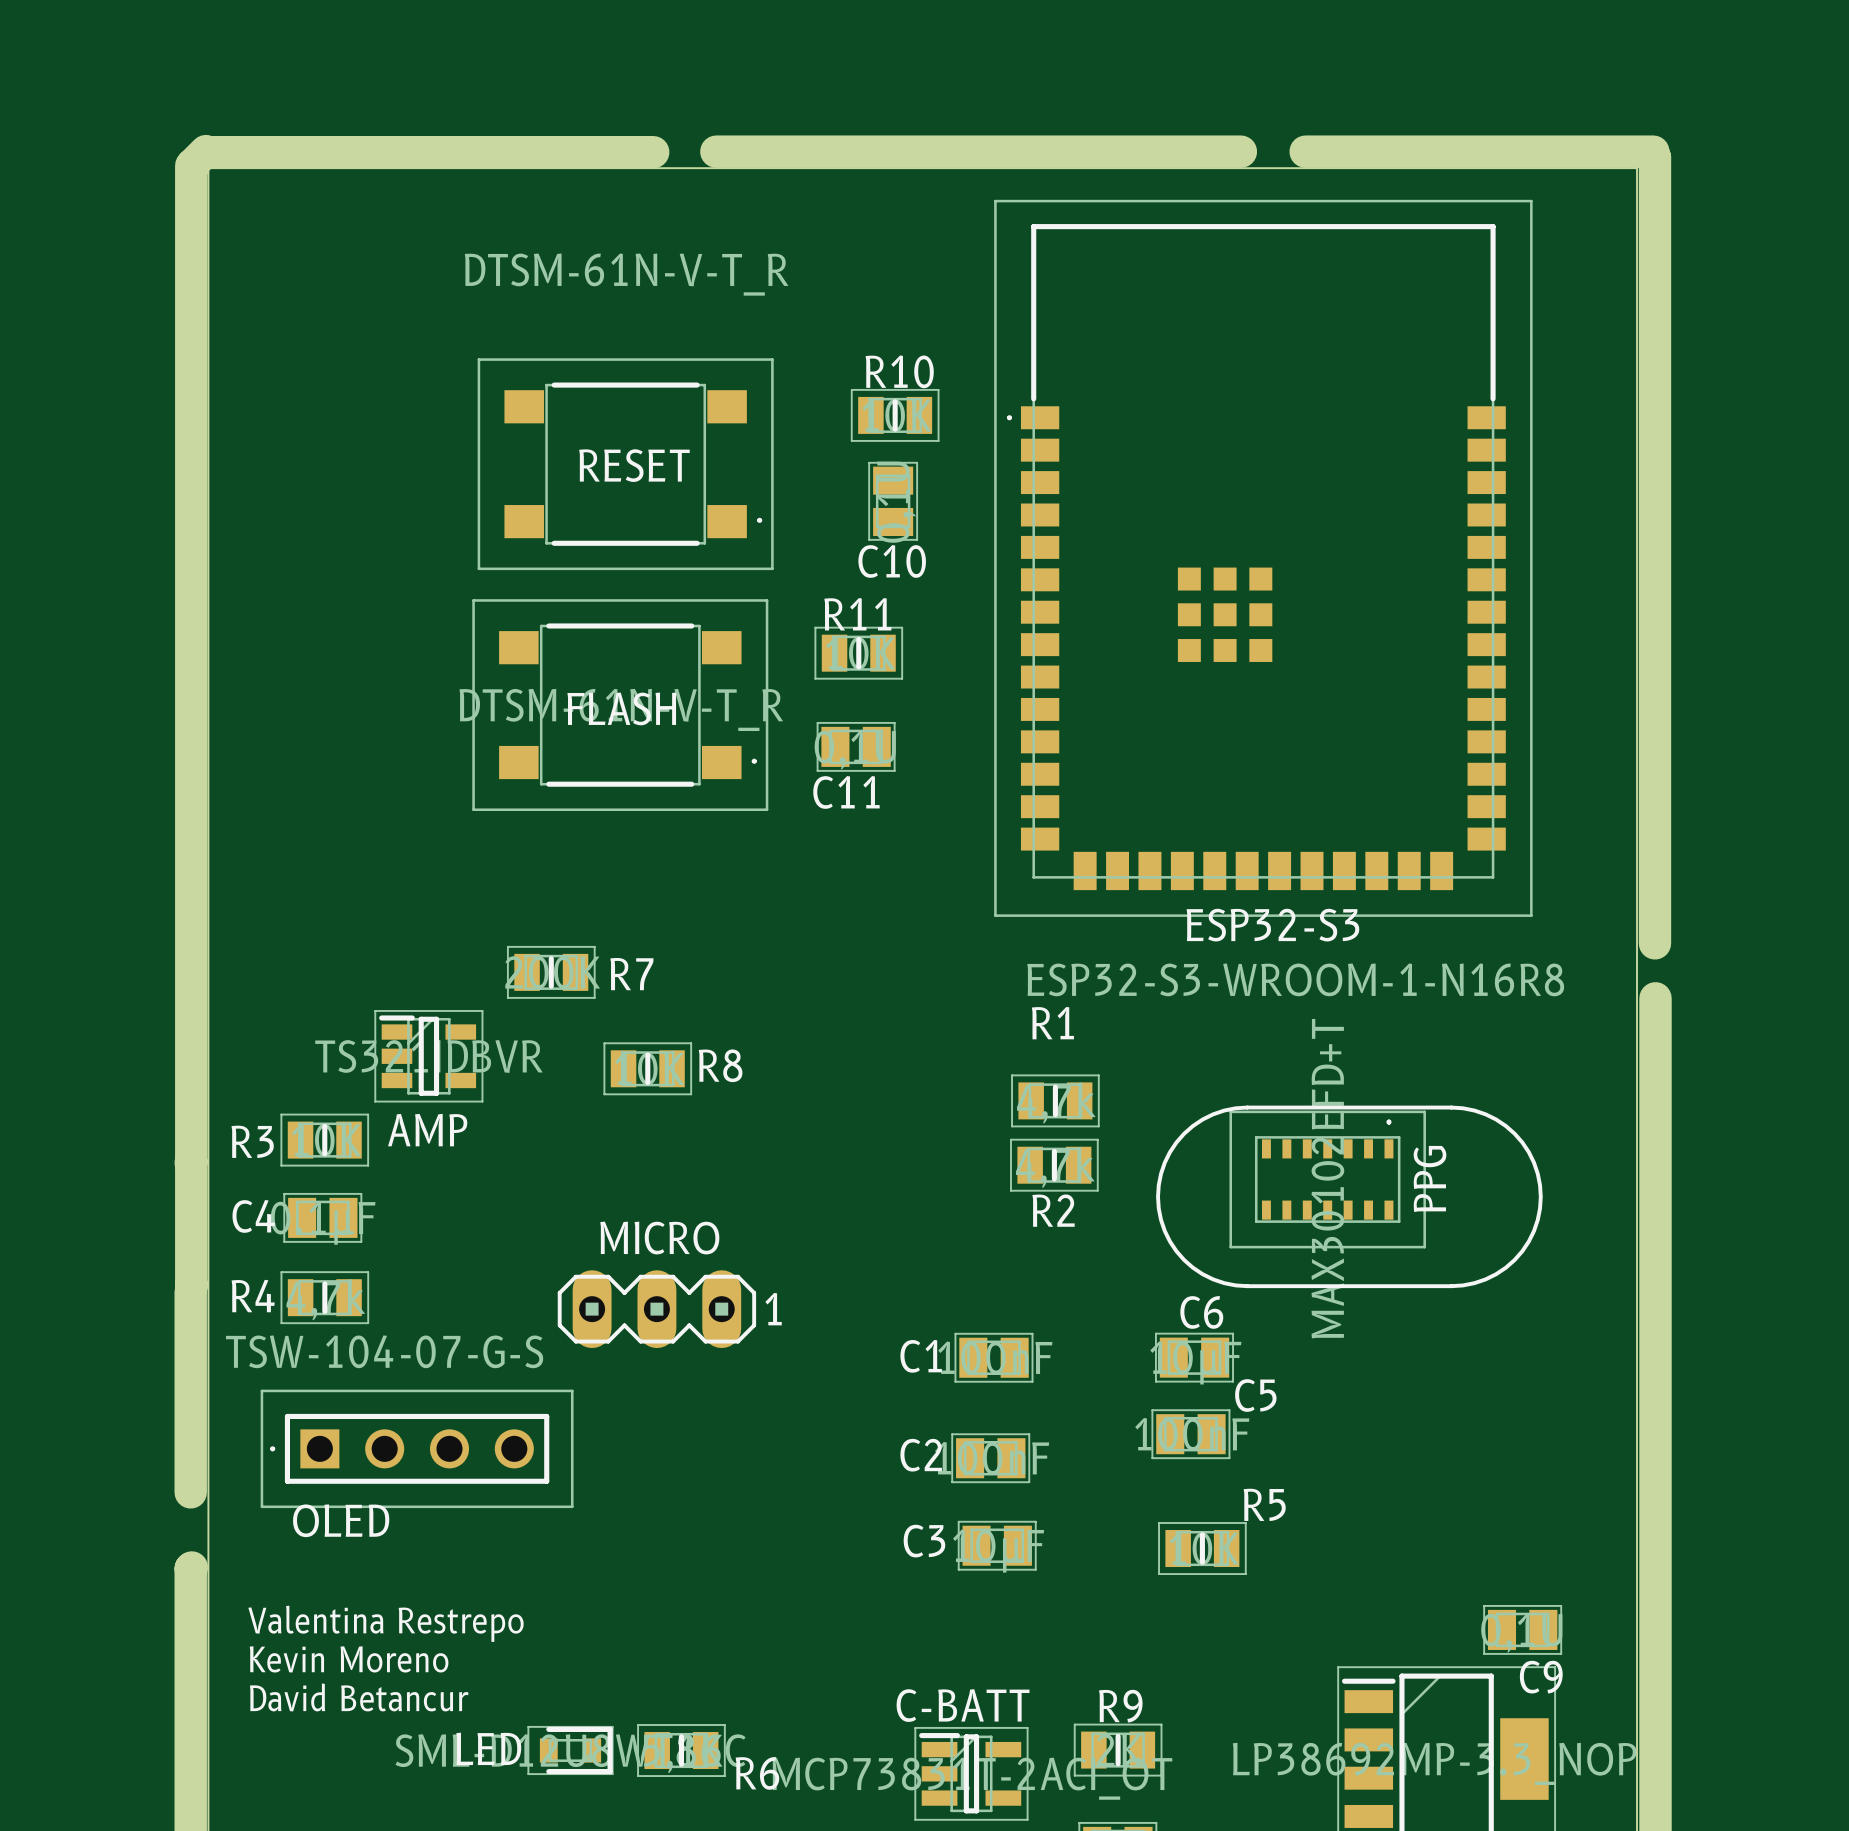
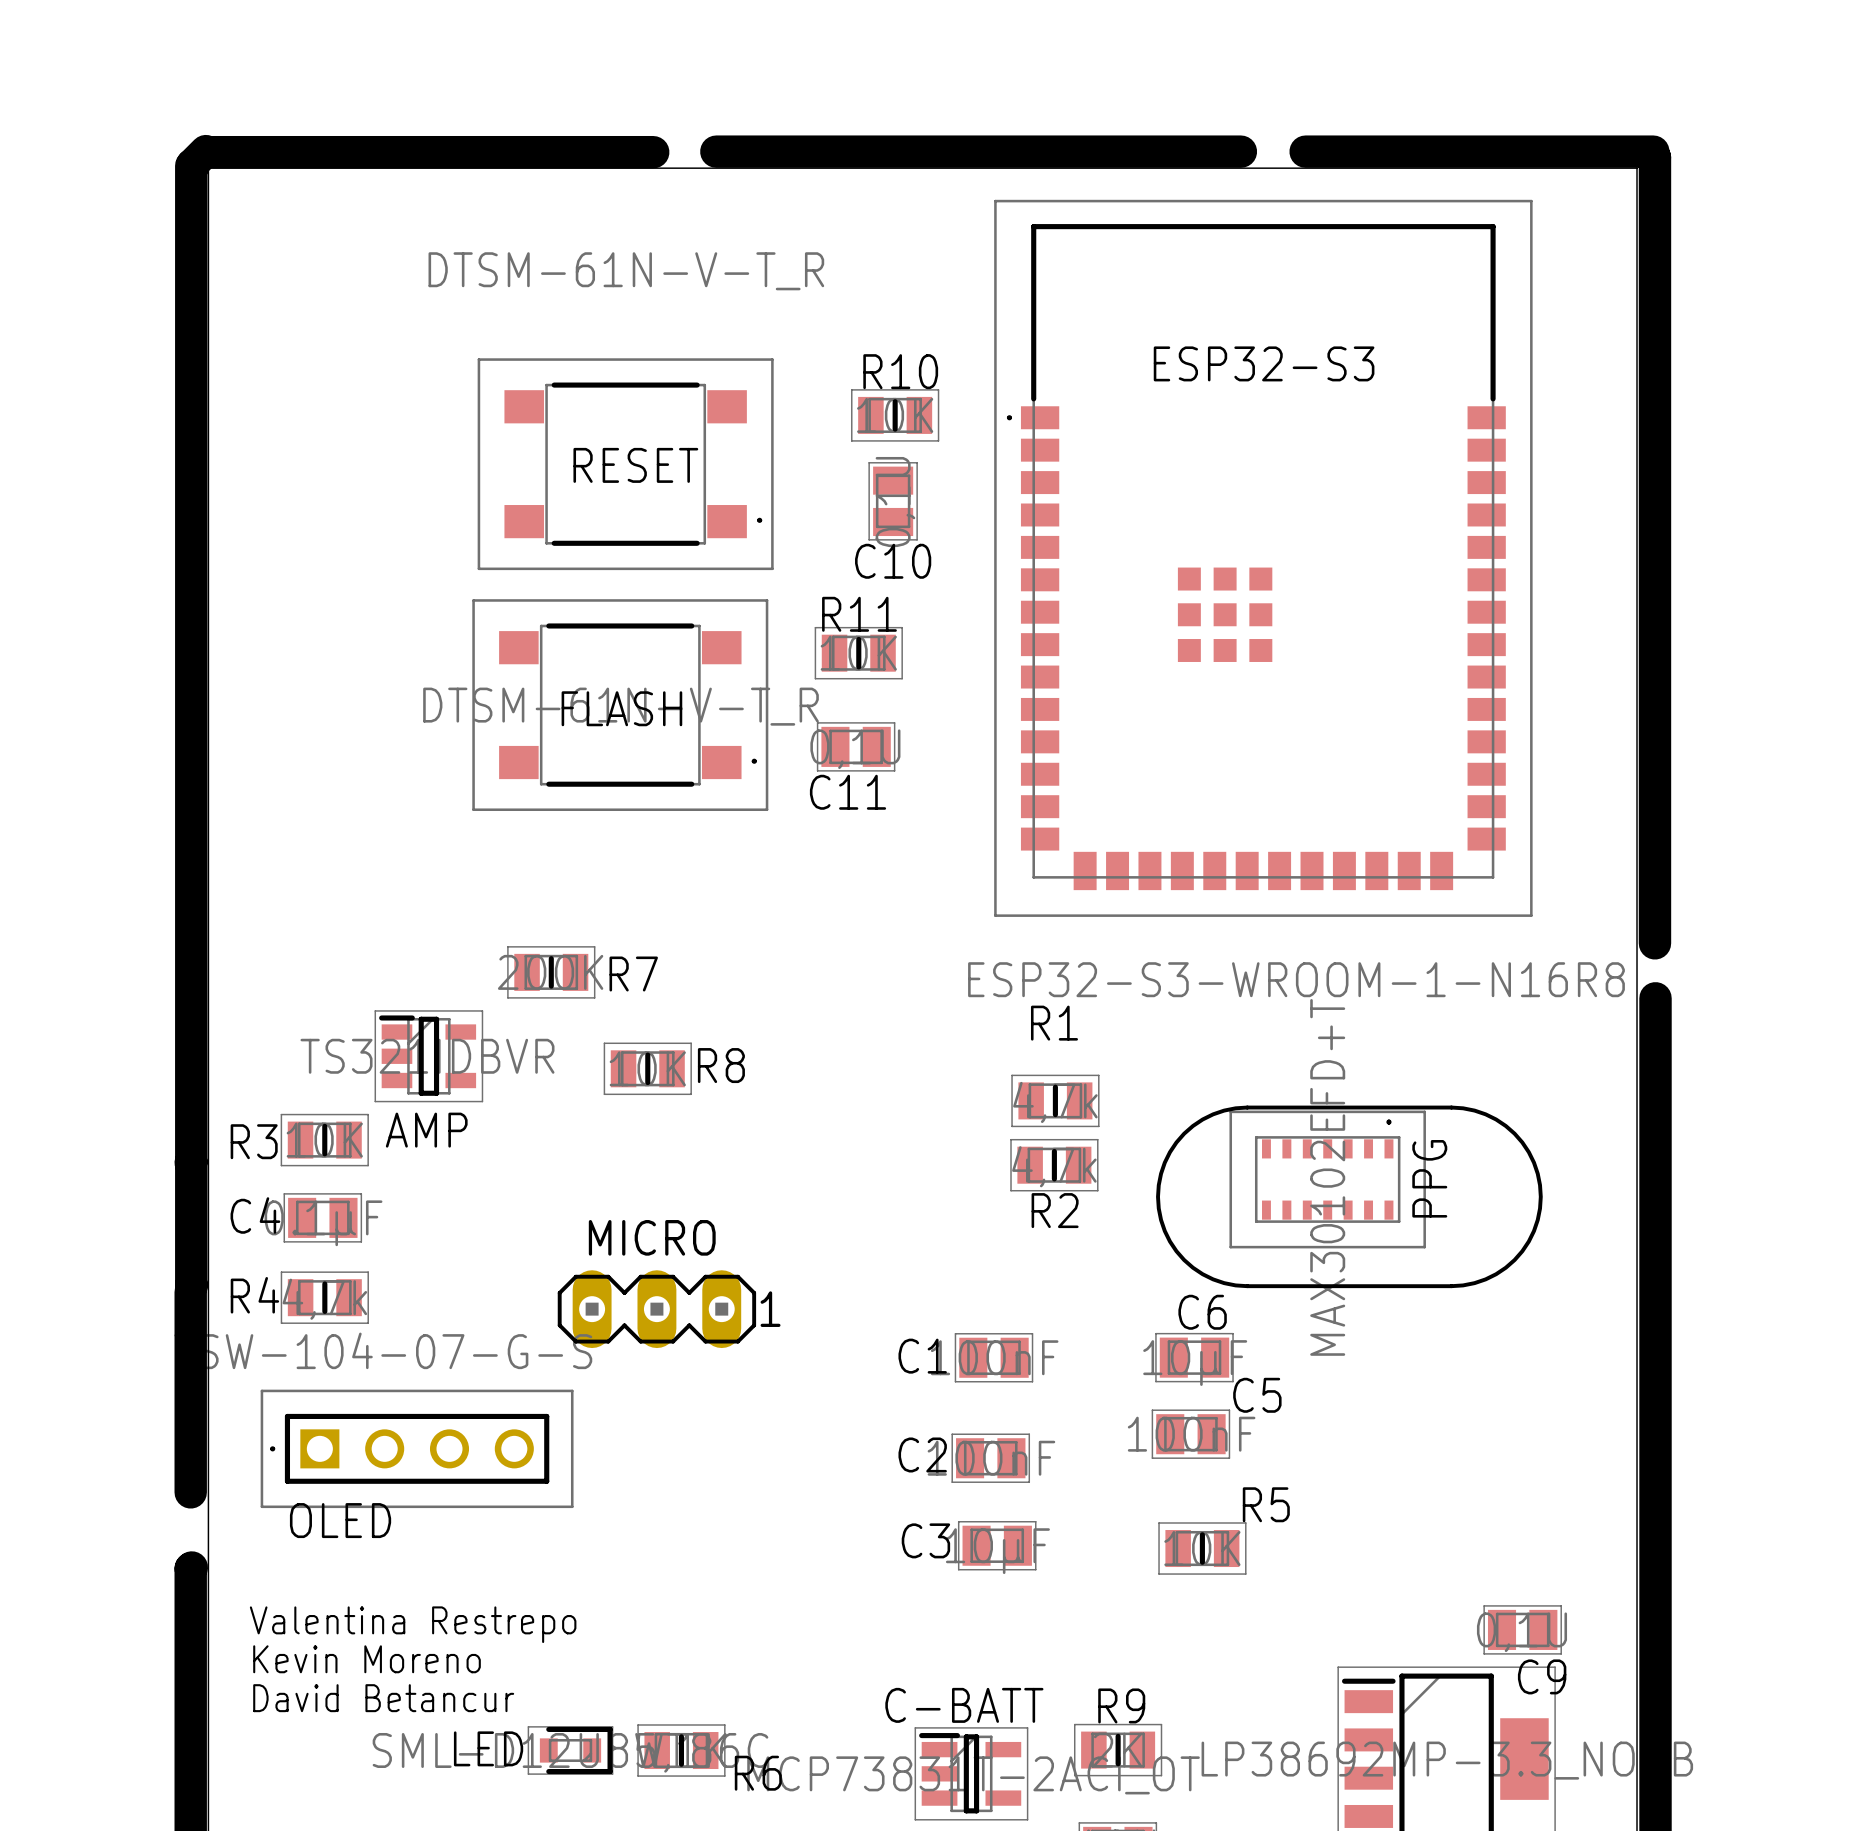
ESP32-S3 name position: ESP32-S3 (1272, 925) -> ESP32-S3 (1264, 363)

